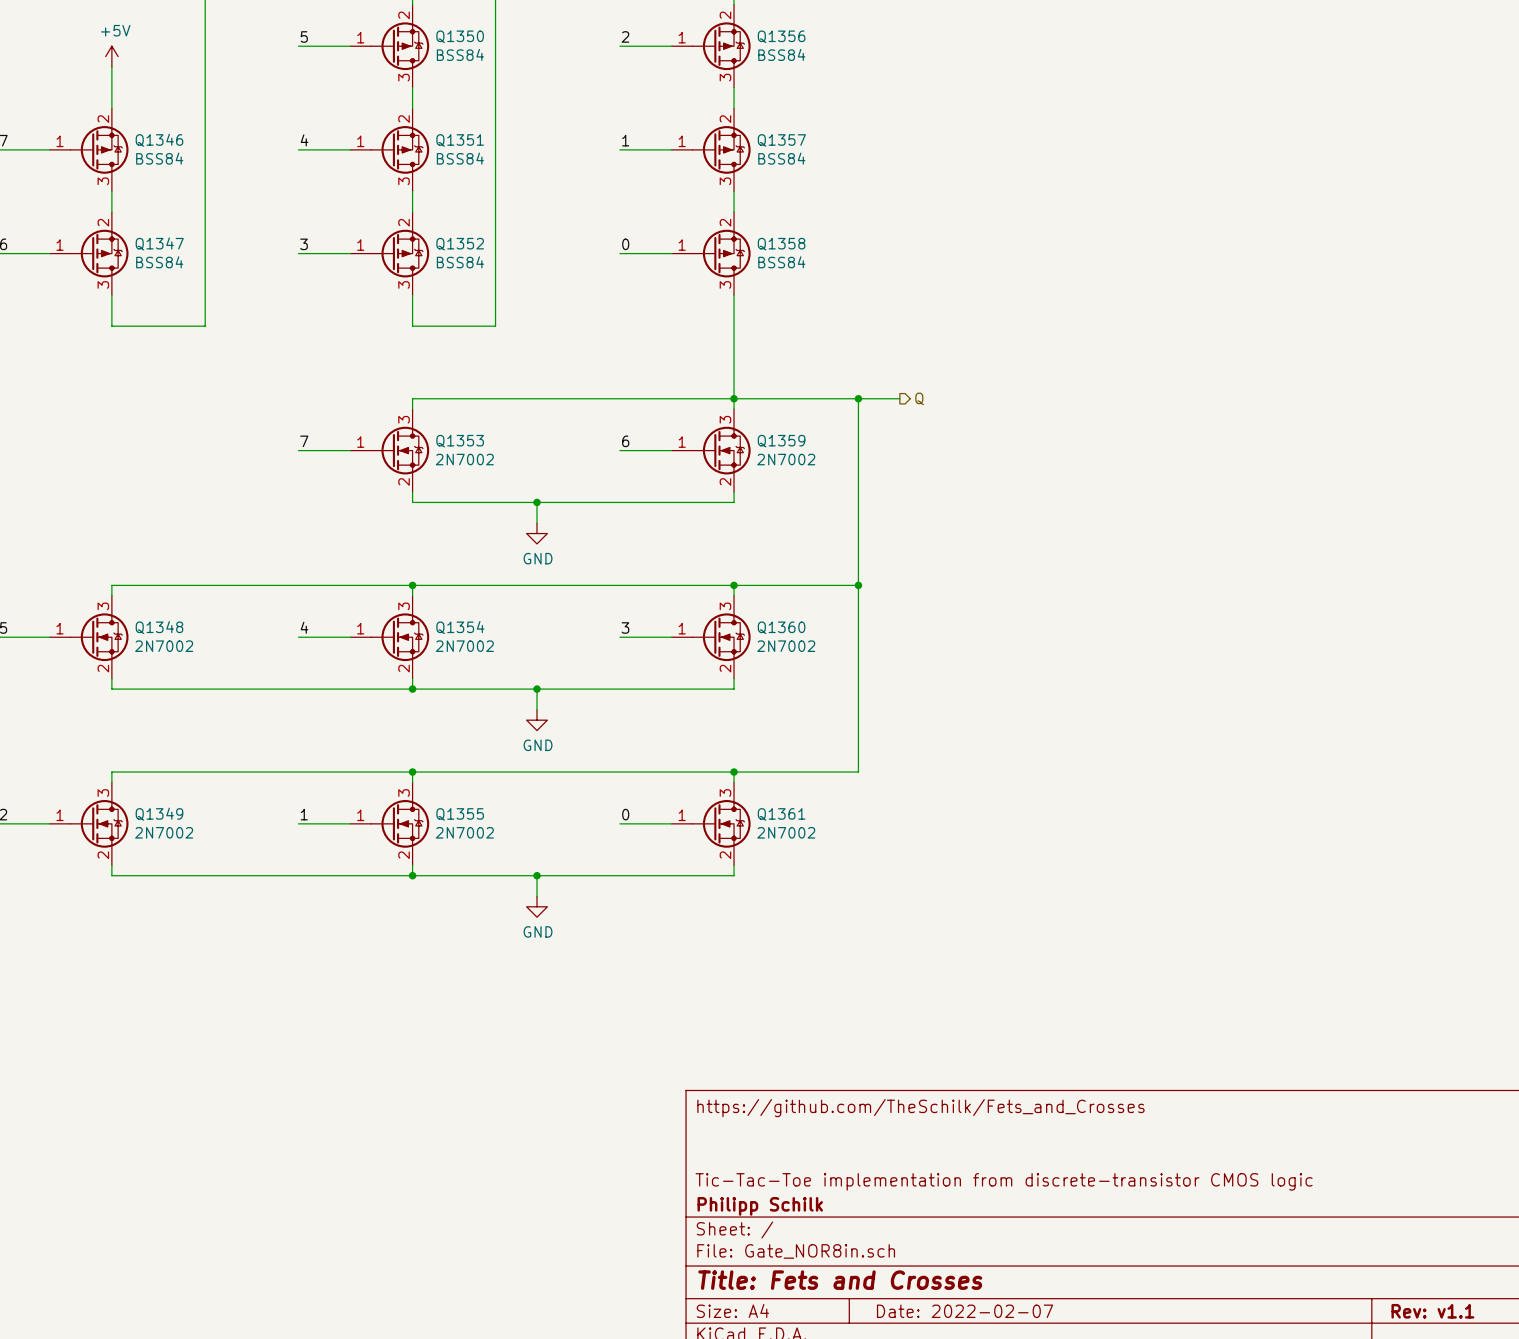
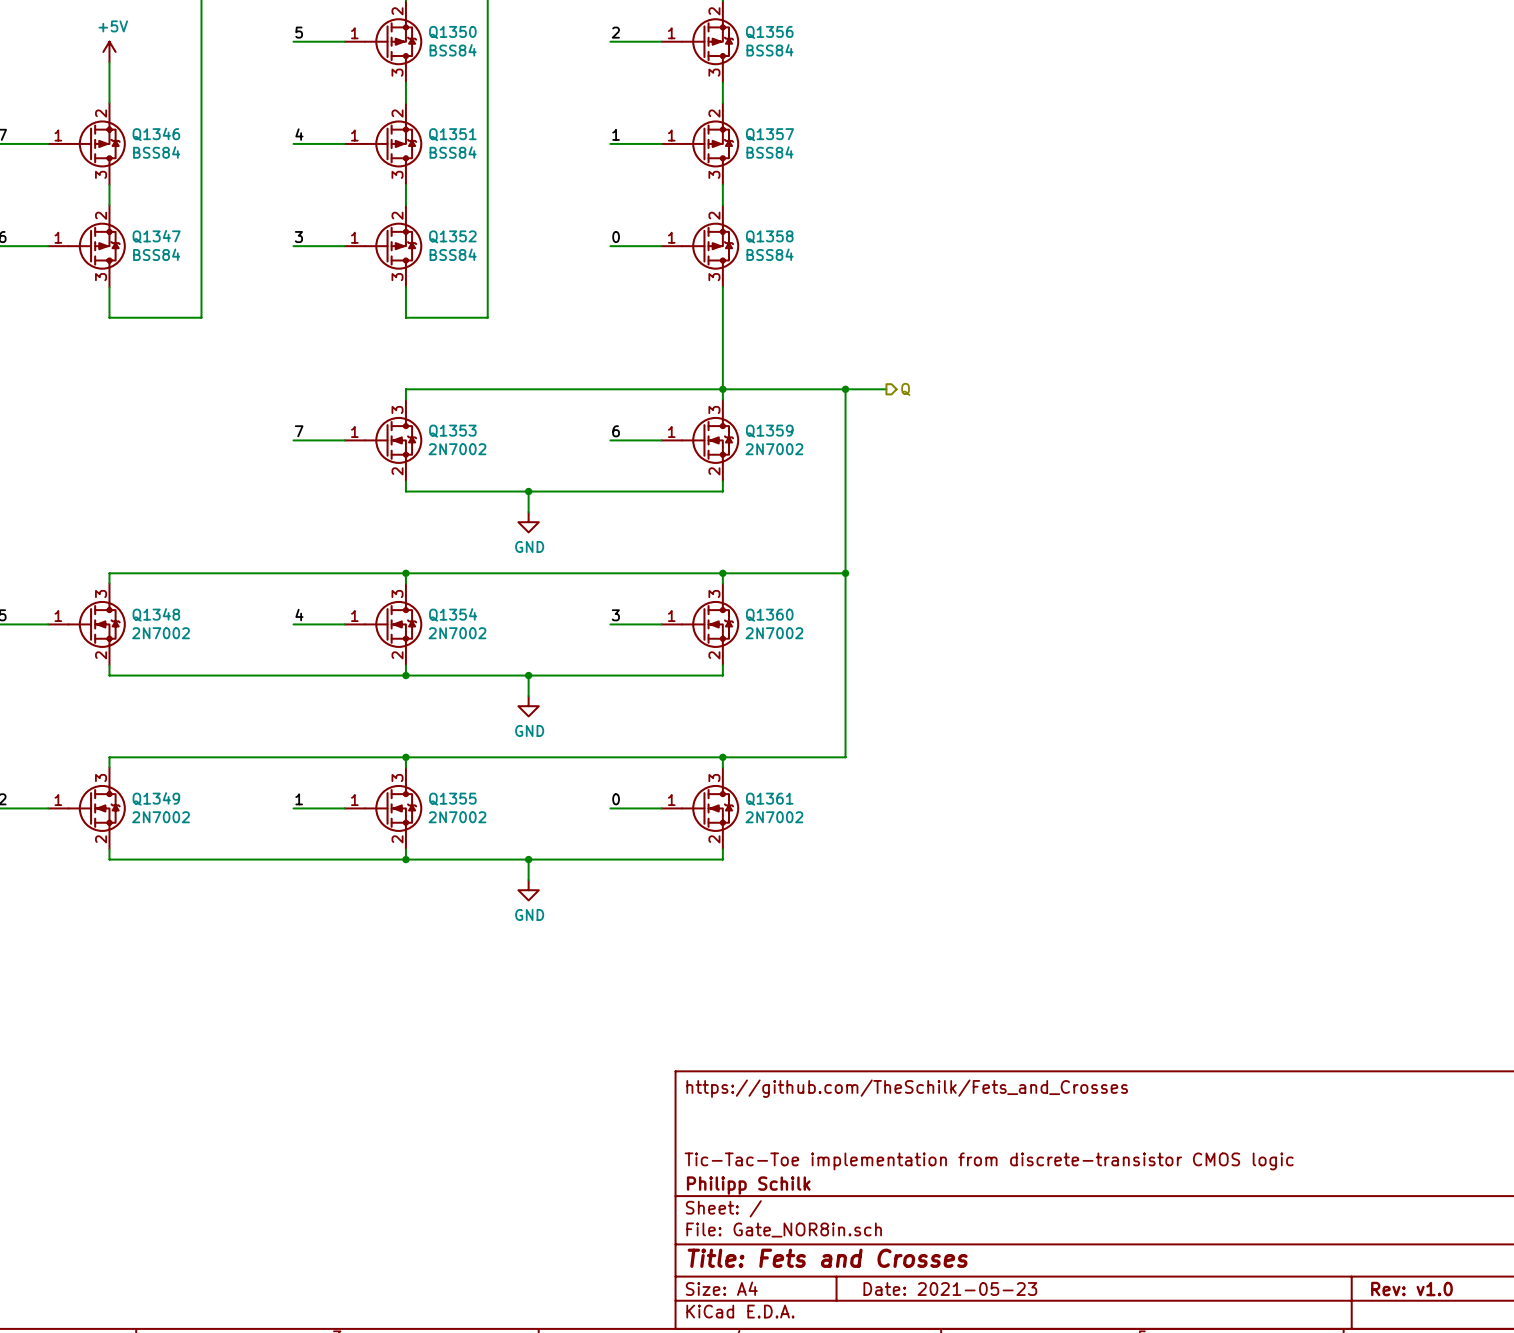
title block: Date: 2022-02-07 (965, 1311) -> Date: 2021-05-23 (950, 1289)
title block: Rev: v1.1 (1432, 1311) -> Rev: v1.0 (1411, 1289)

